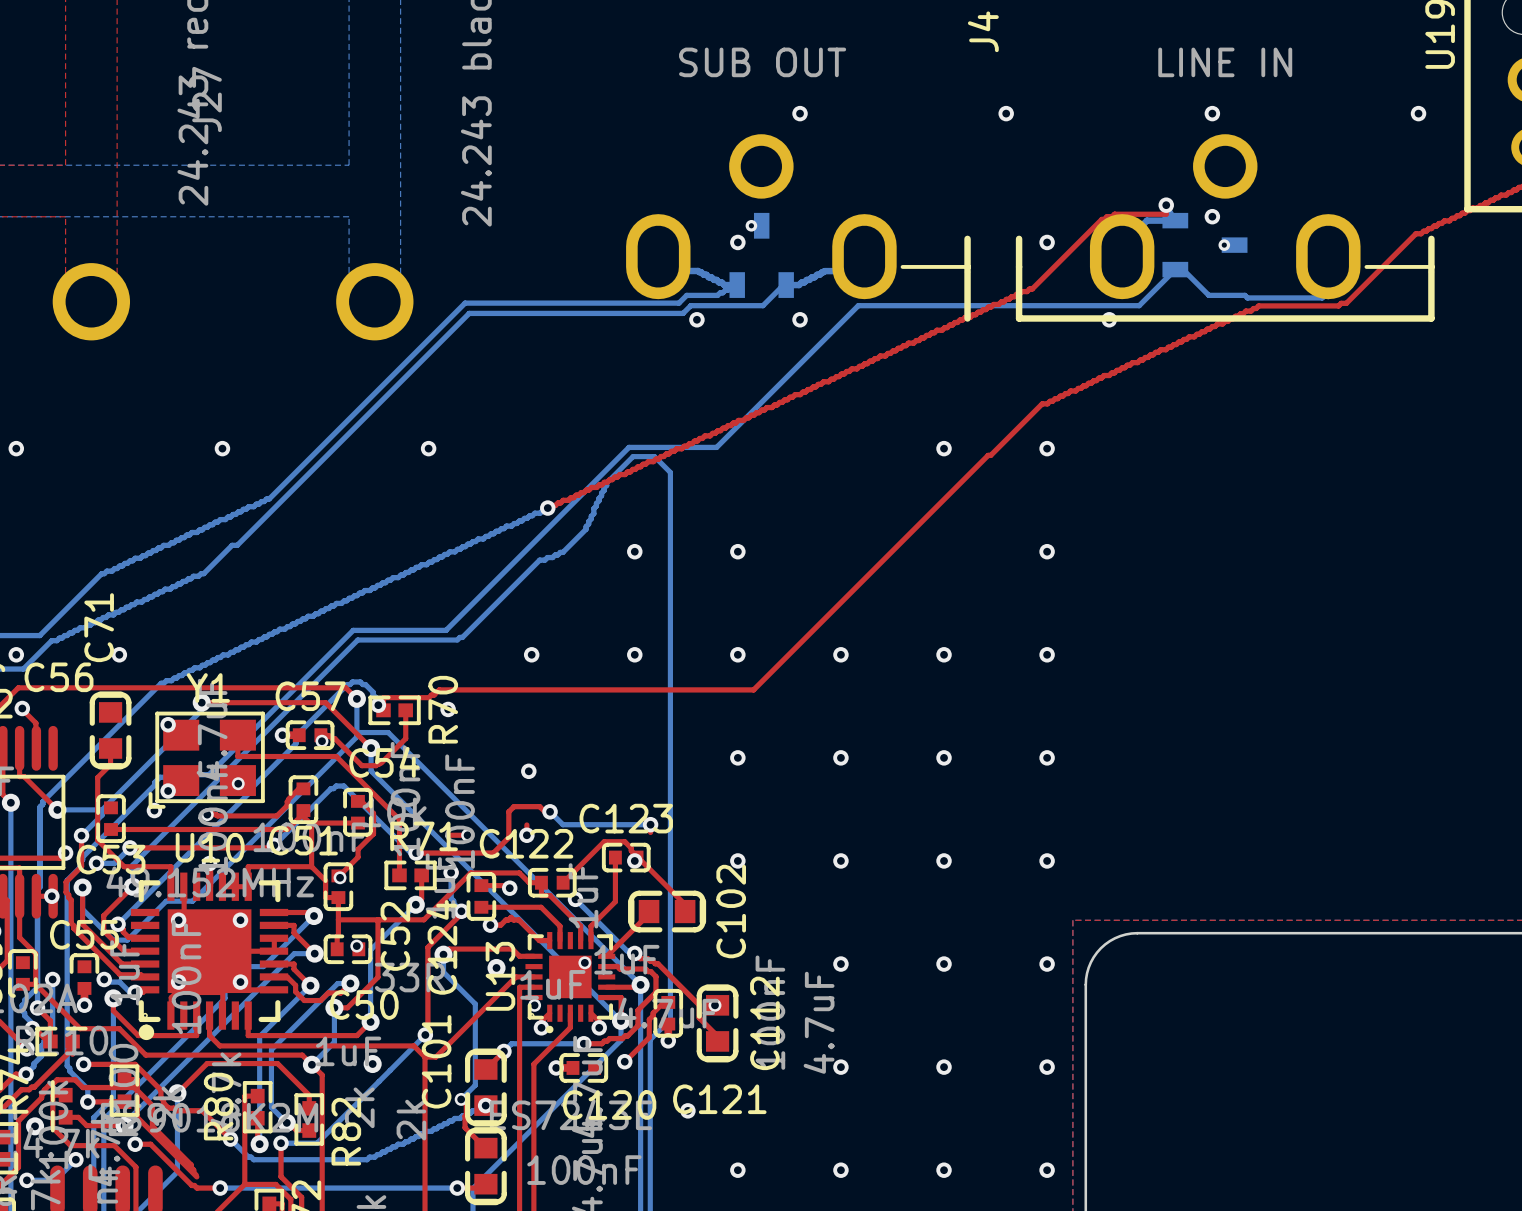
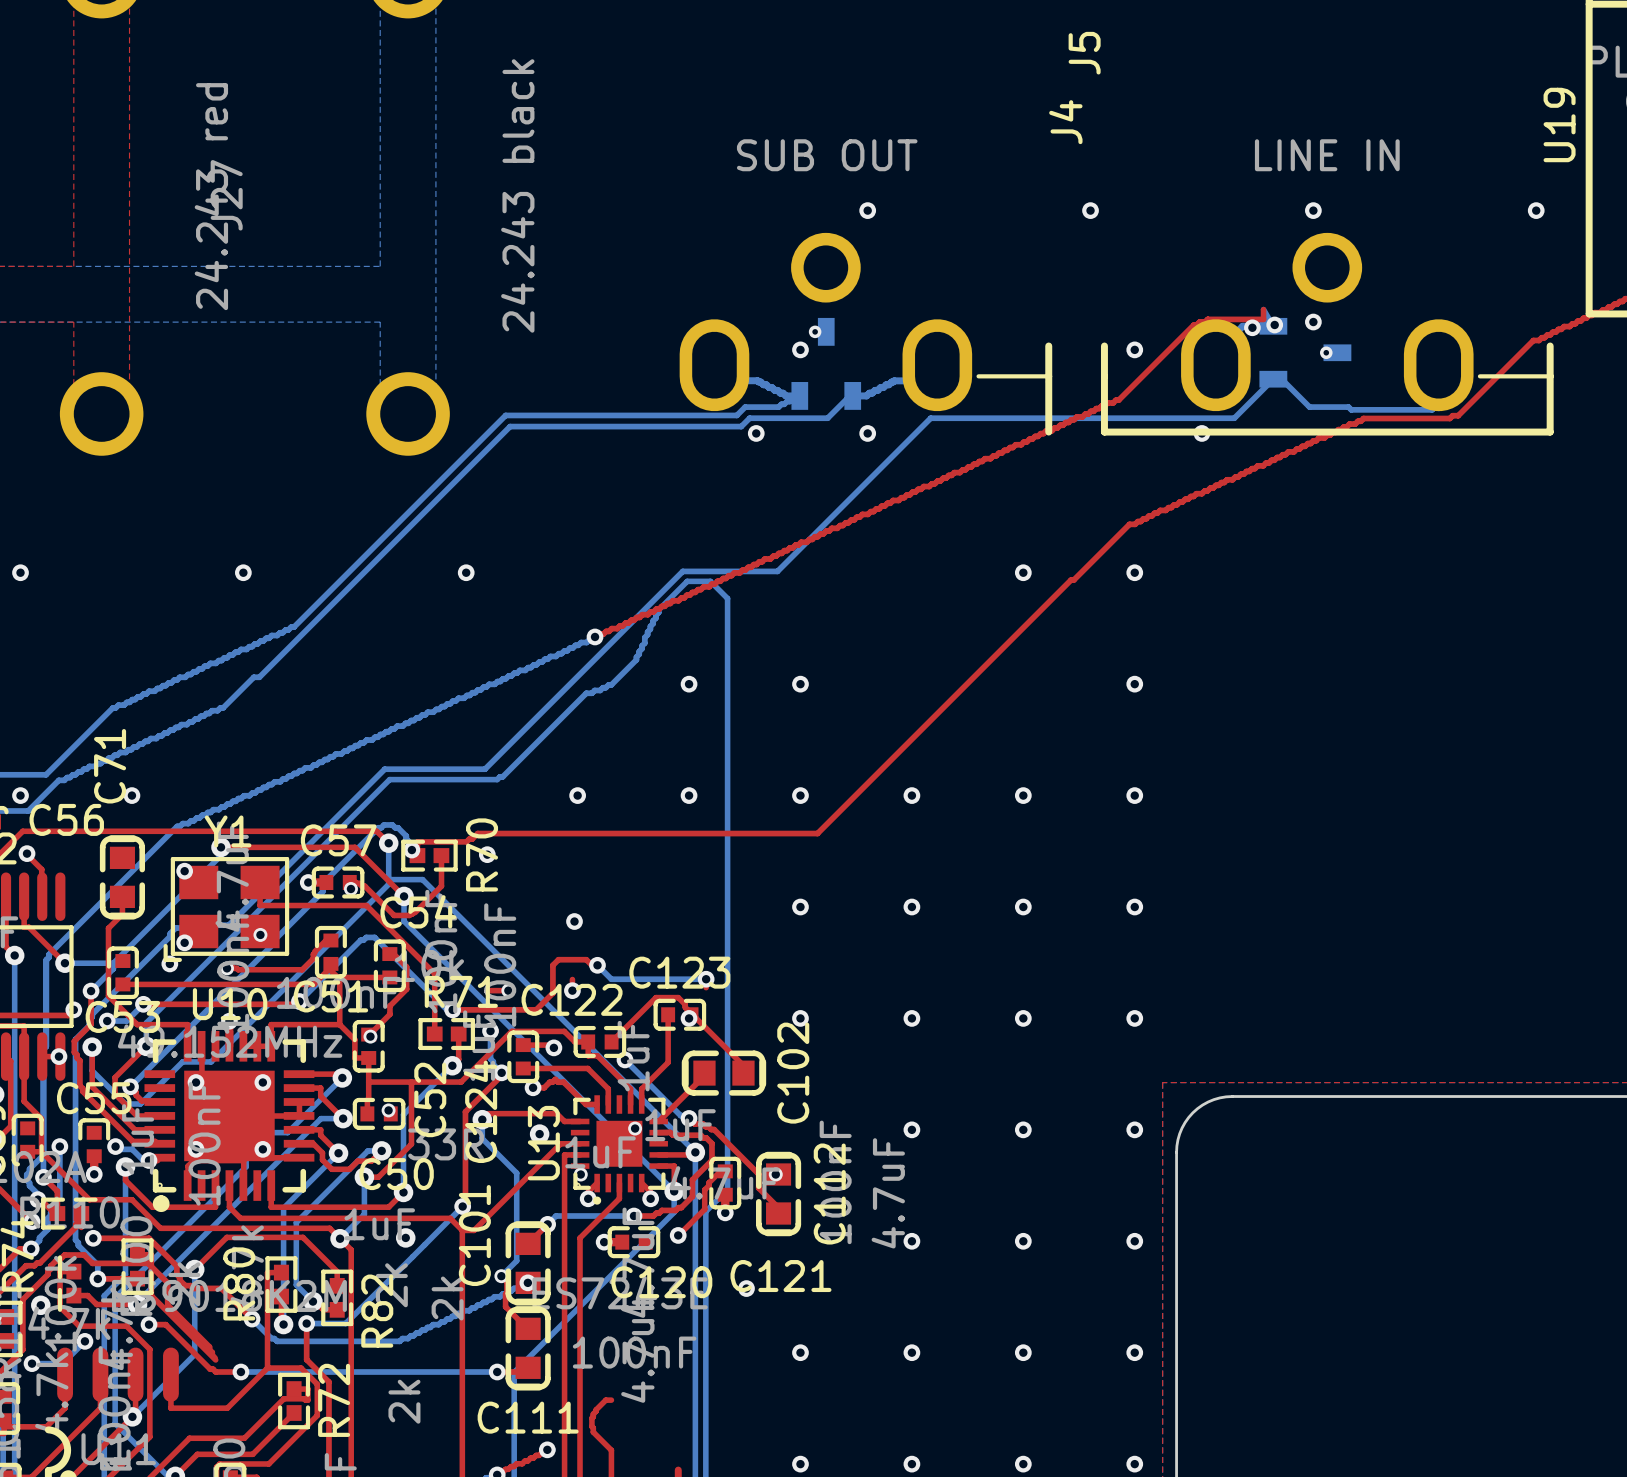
via position: (1166, 205) -> (1274, 324)
via: none -> (1252, 327)

